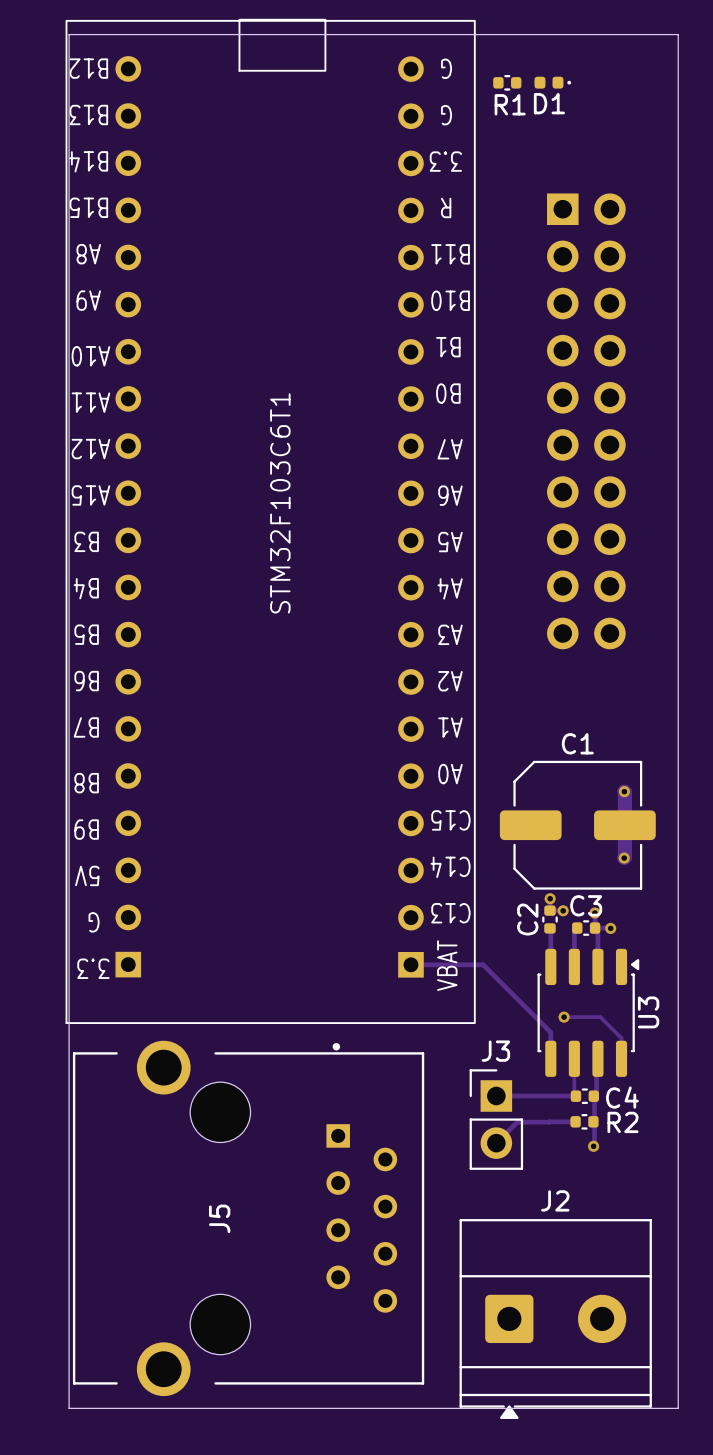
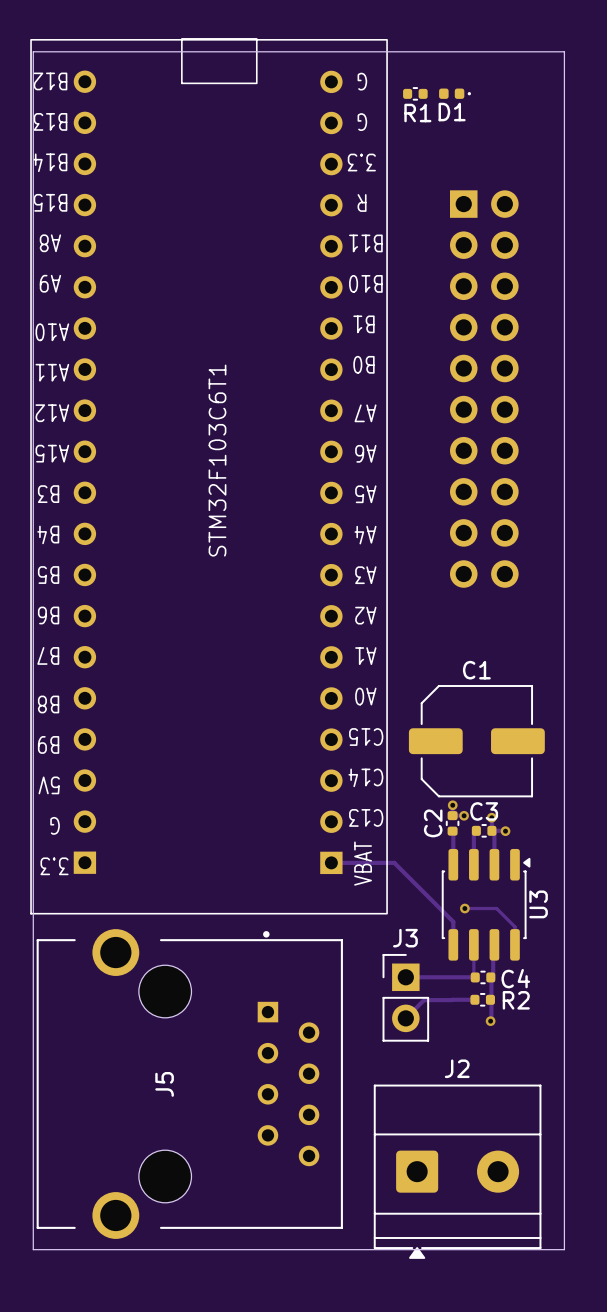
track: (624, 791) (624, 858) -> none
via: (624, 791) -> none
via: (624, 858) -> none

